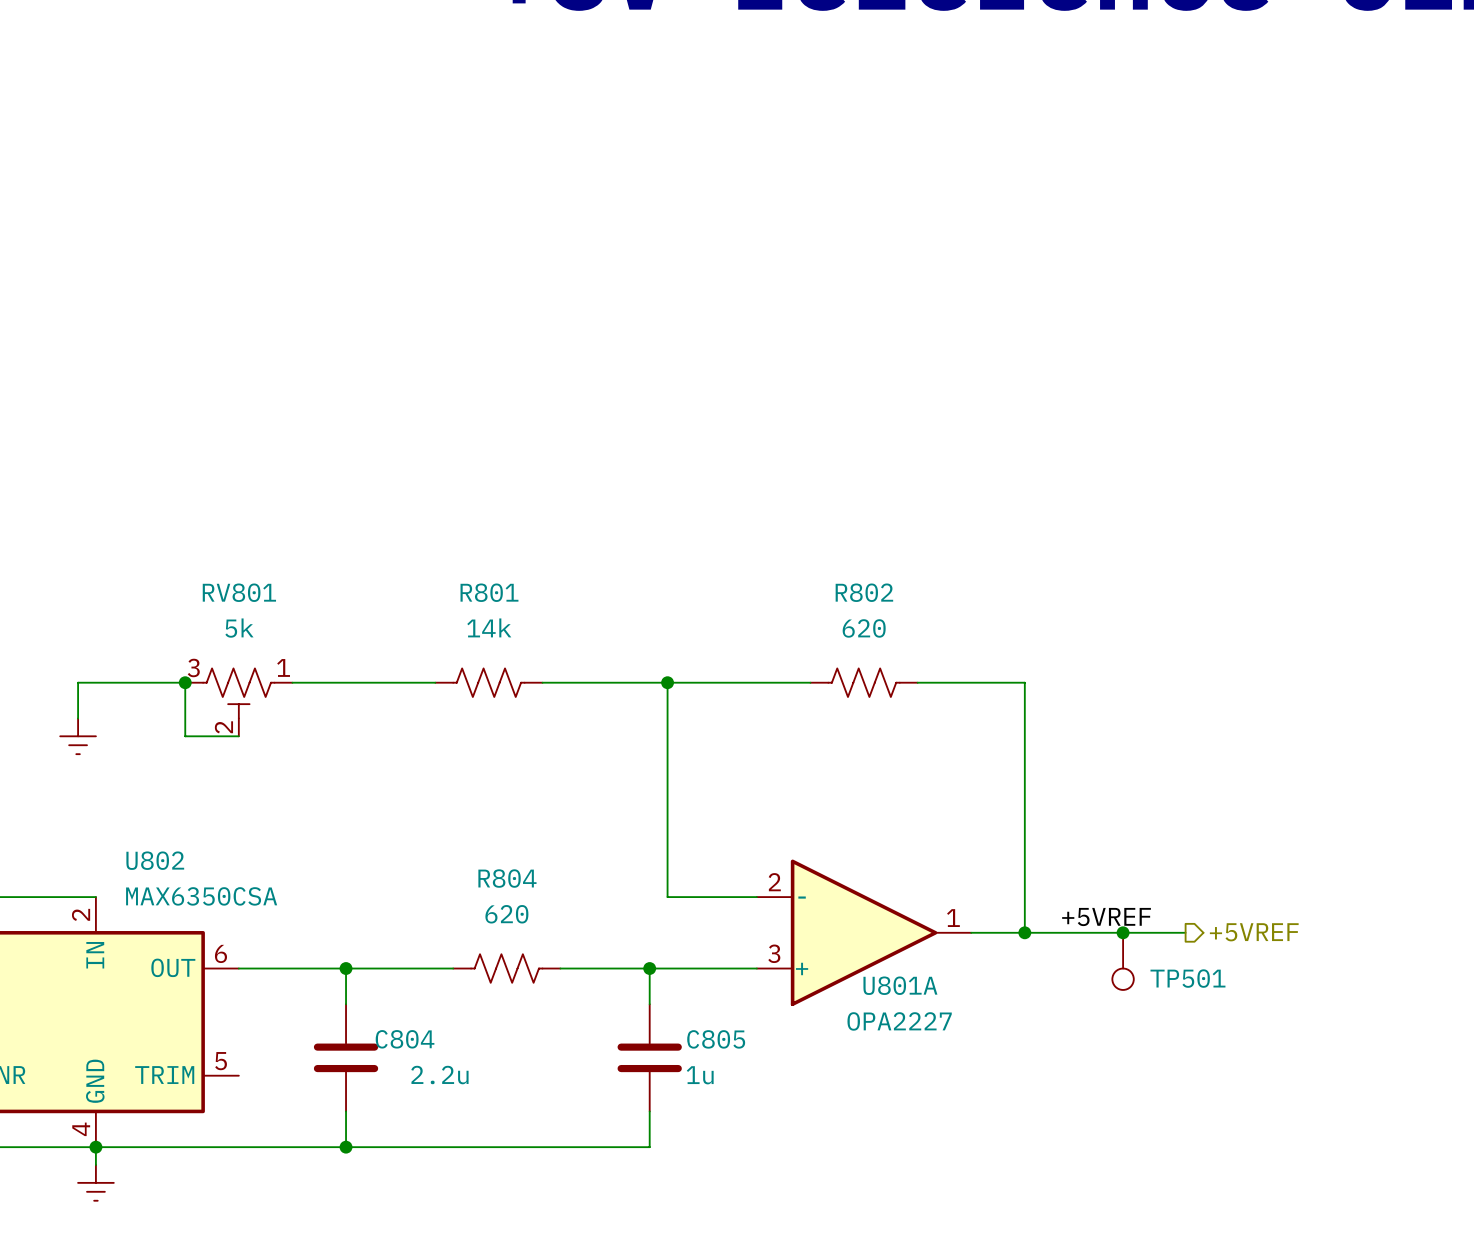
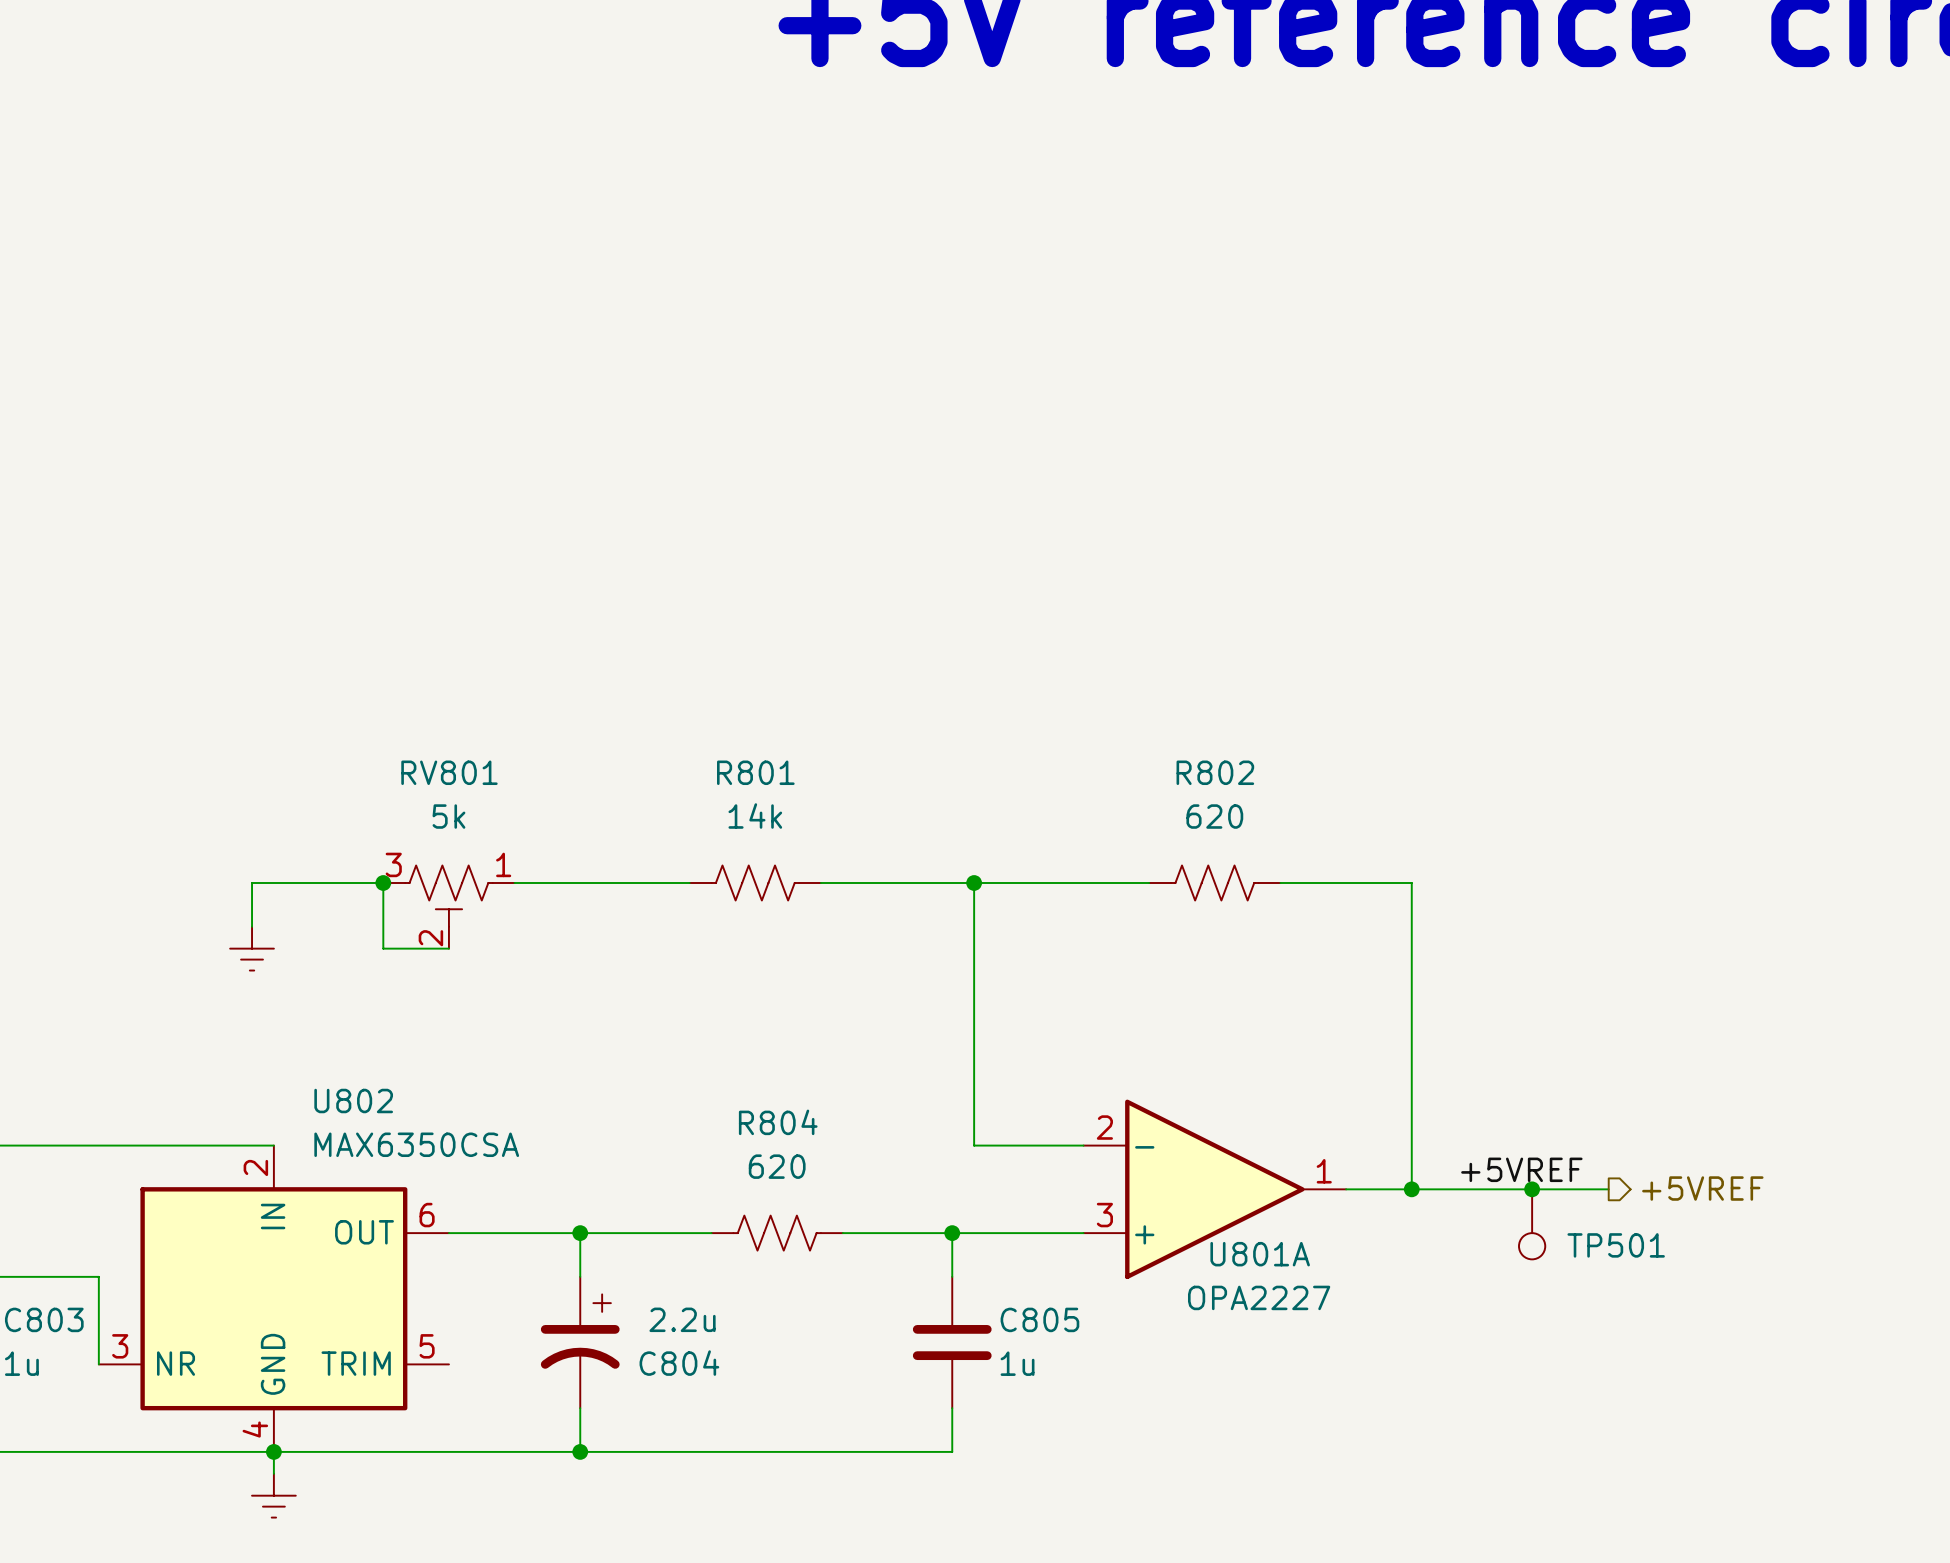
C804 symbol: [313, 1004, 379, 1112] -> [540, 1276, 620, 1409]
C804 name position: C804 (405, 1039) -> C804 (679, 1363)
C804 value position: 2.2u (439, 1075) -> 2.2u (682, 1319)

